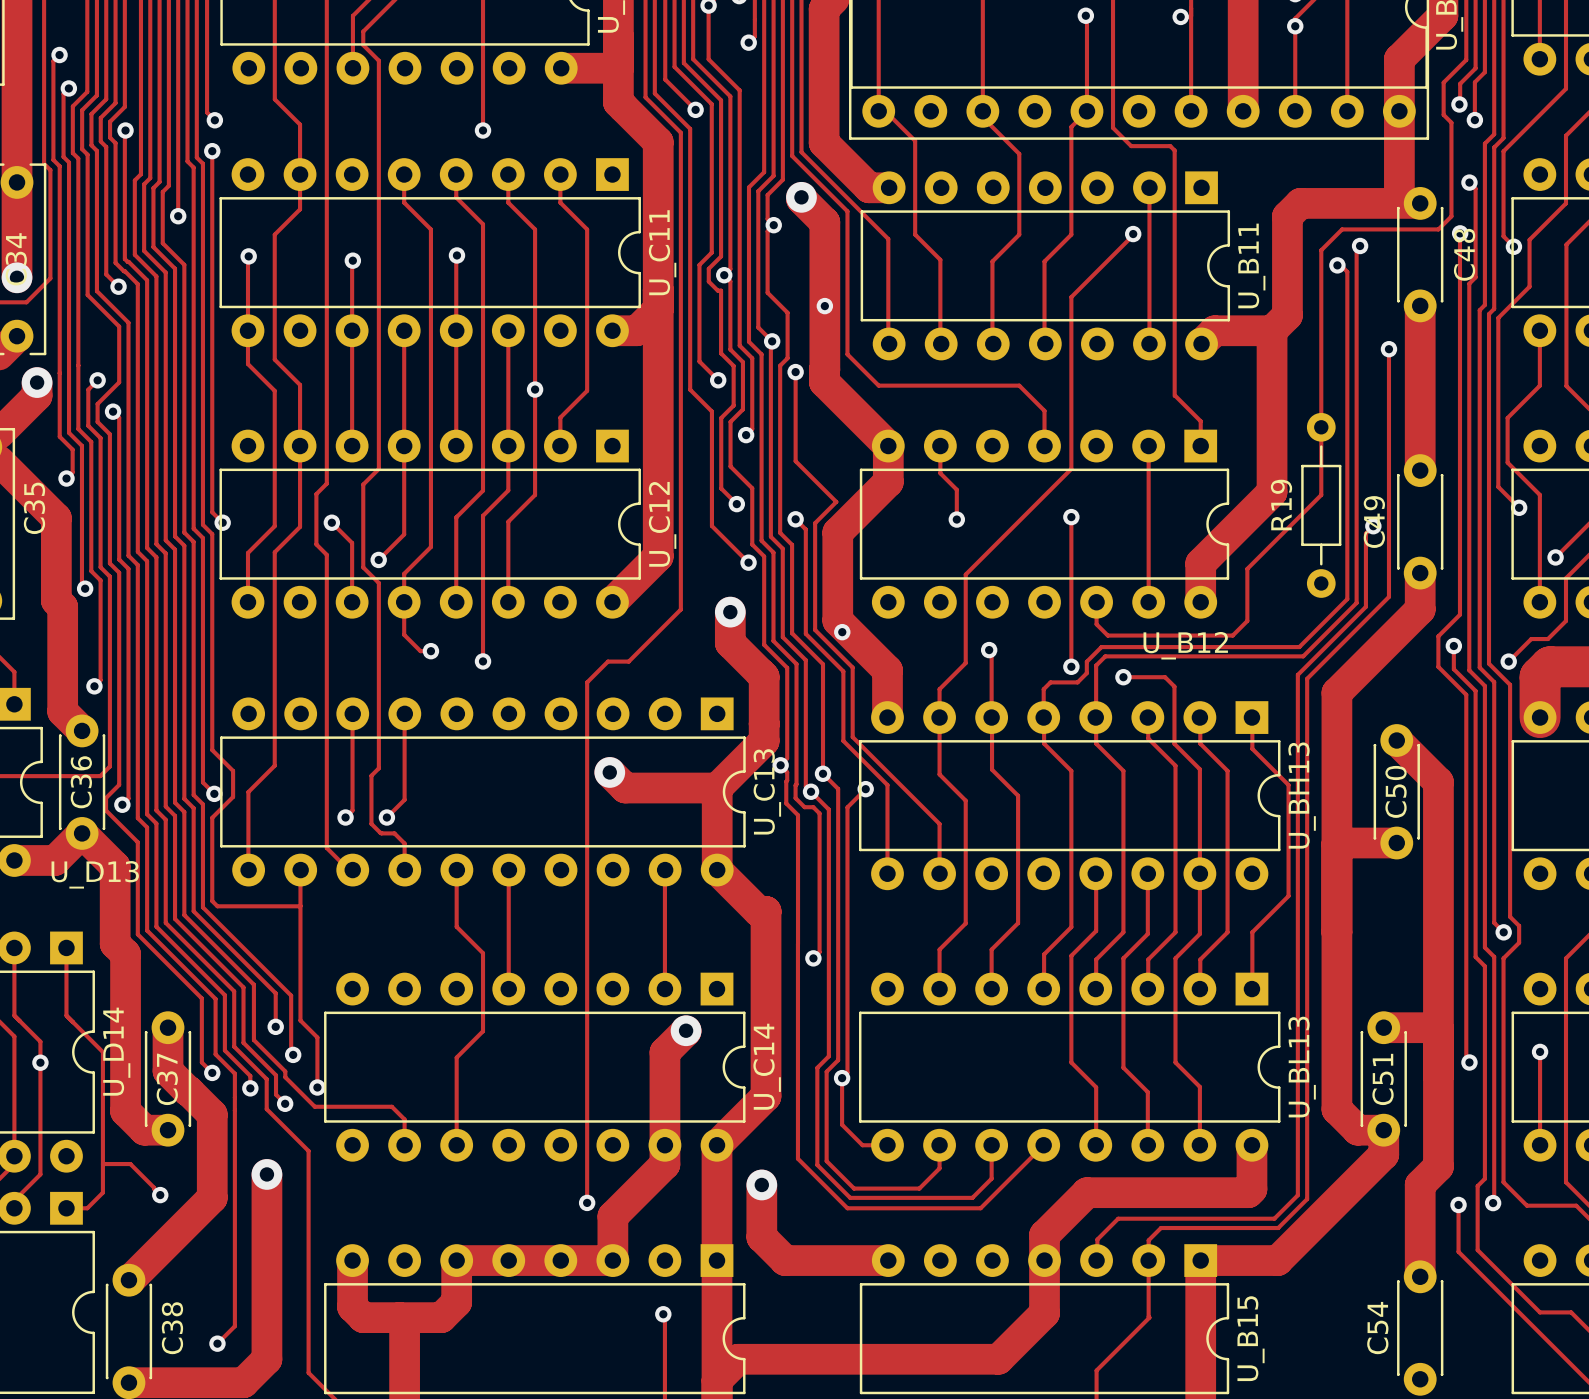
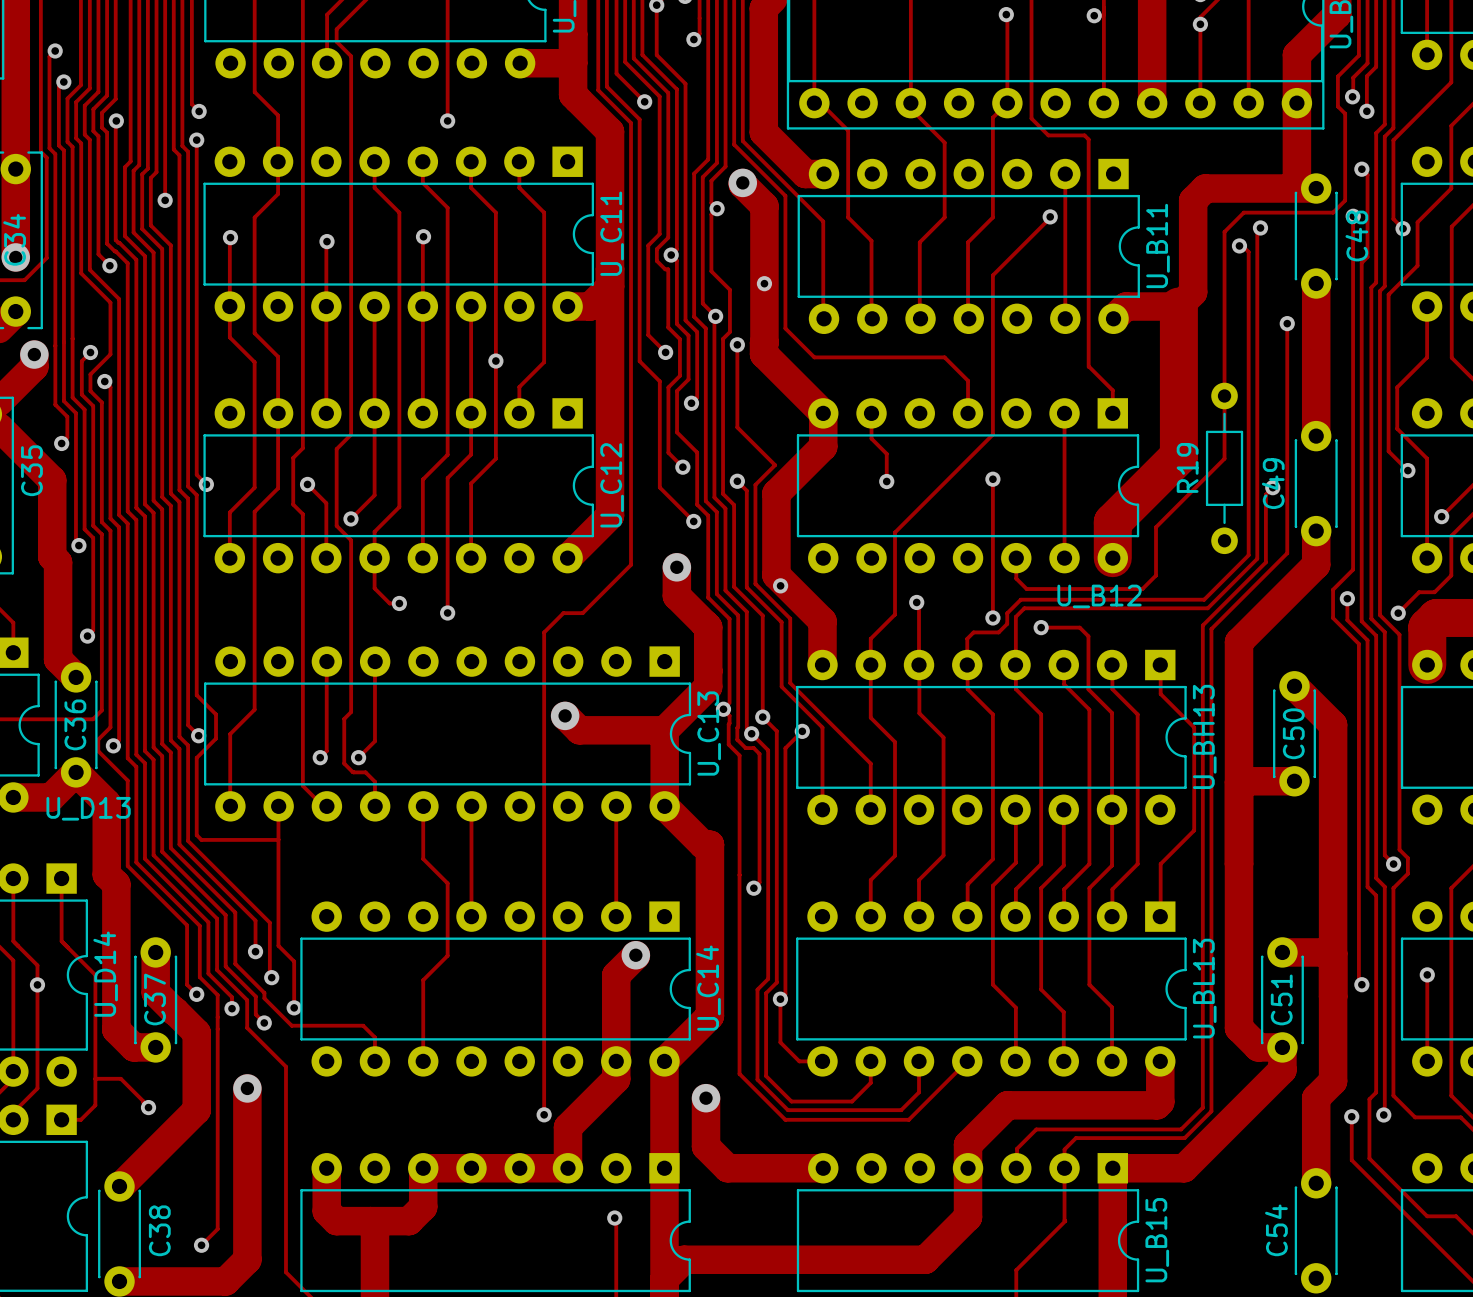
track width: thin (1272, 330) (1272, 492) (1200, 563) (1200, 602) -> thick (1178, 306) (1178, 456) (1112, 522) (1112, 558)

